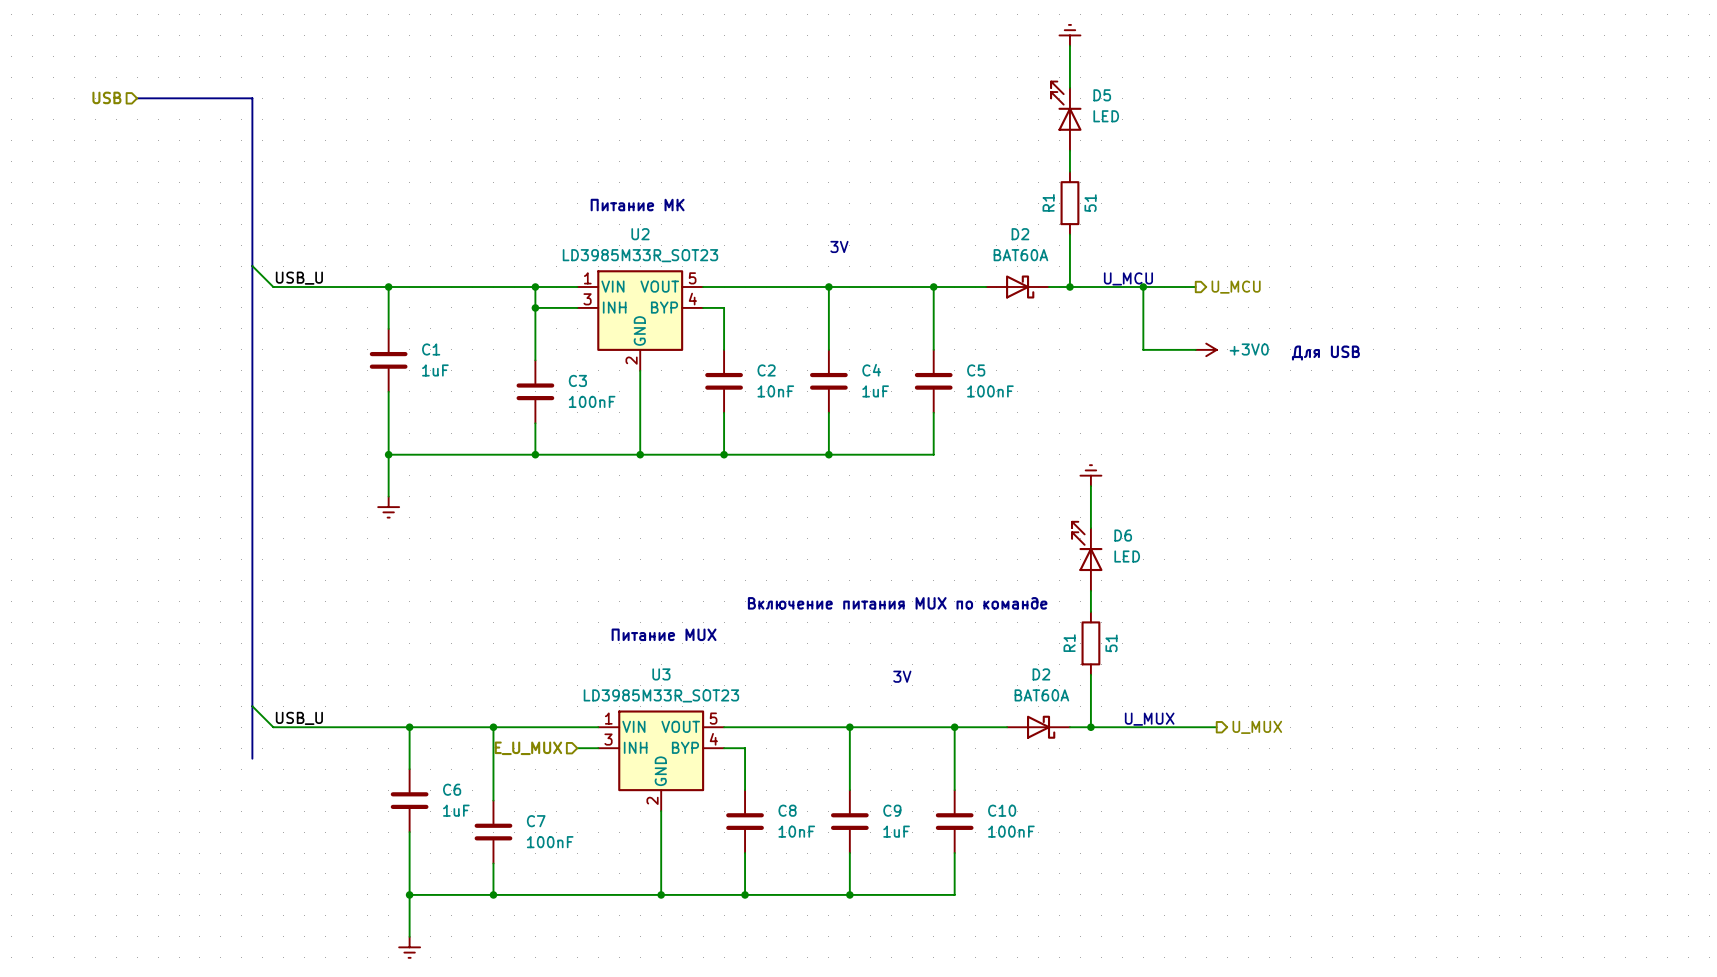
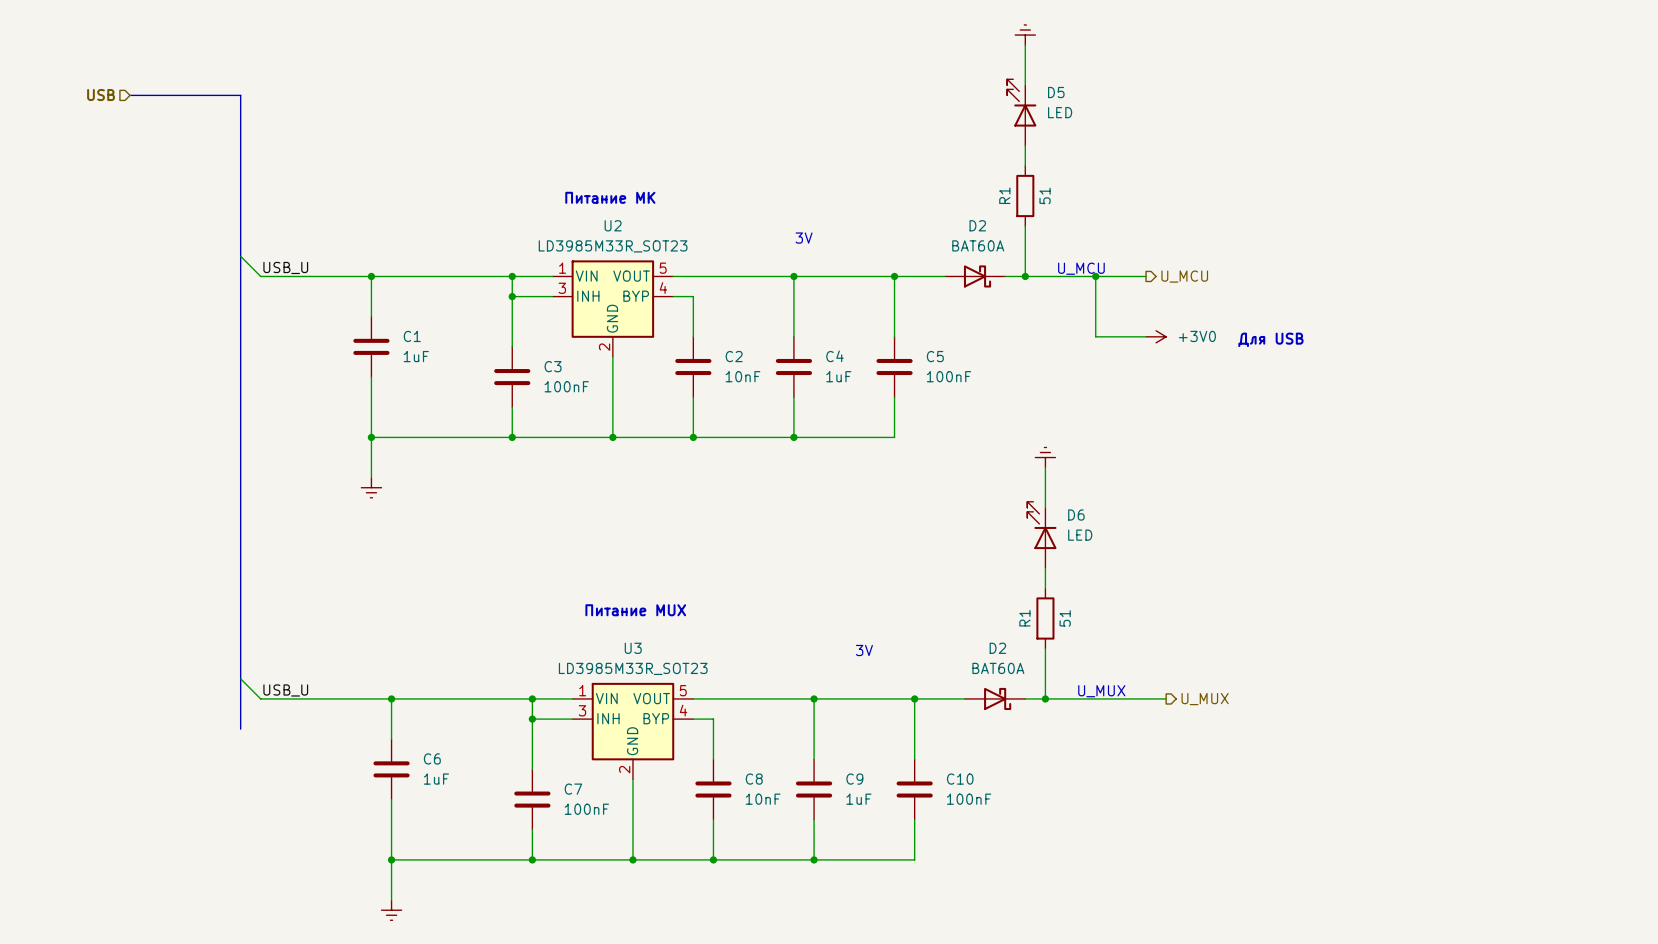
text: Включение питания MUX по команде (897, 603) -> none
wire: (493, 727) (493, 800) -> (532, 698) (532, 769)
junction: (493, 727) -> none
junction: none -> (532, 698)
hierarchical label: E_U_MUX (528, 748) -> none
wire: none -> (532, 719) (552, 719)
junction: none -> (532, 719)
C7 position: (493, 832) -> (532, 799)
wire: (493, 863) (493, 894) -> (532, 829) (532, 859)
junction: (493, 894) -> none
junction: none -> (532, 859)

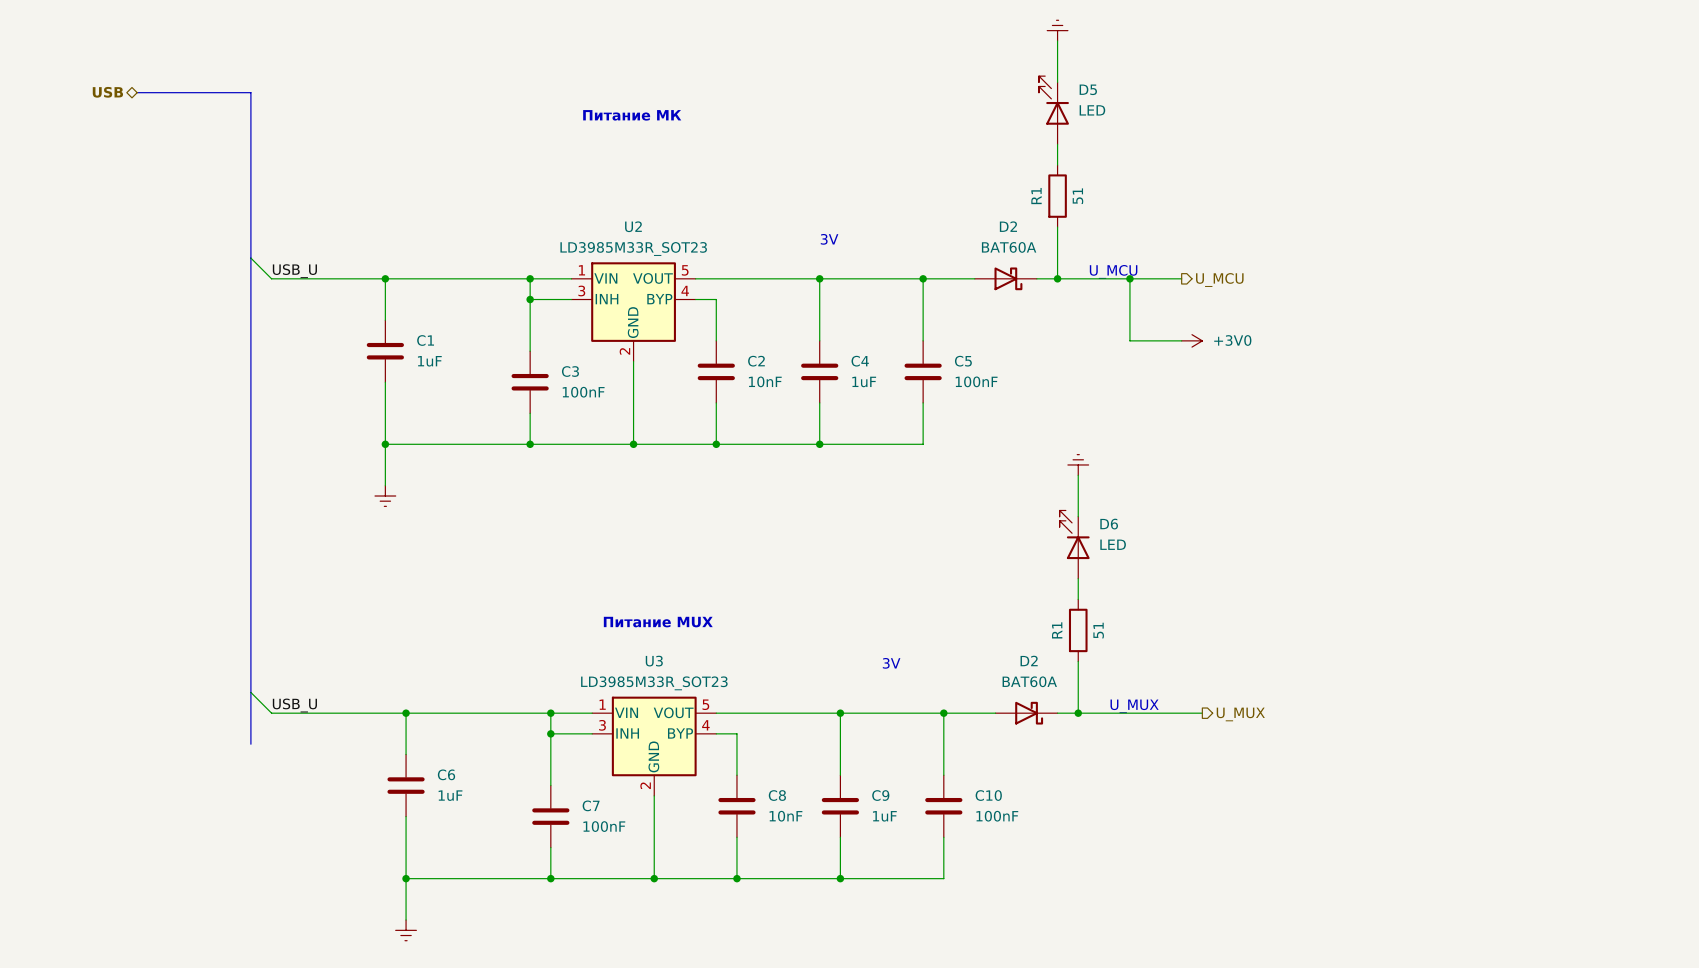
hierarchical label shape: input (101, 95) -> bidirectional (107, 92)
text position: Питание МК (610, 197) -> Питание МК (632, 115)
text: Для USB (1270, 339) -> none

